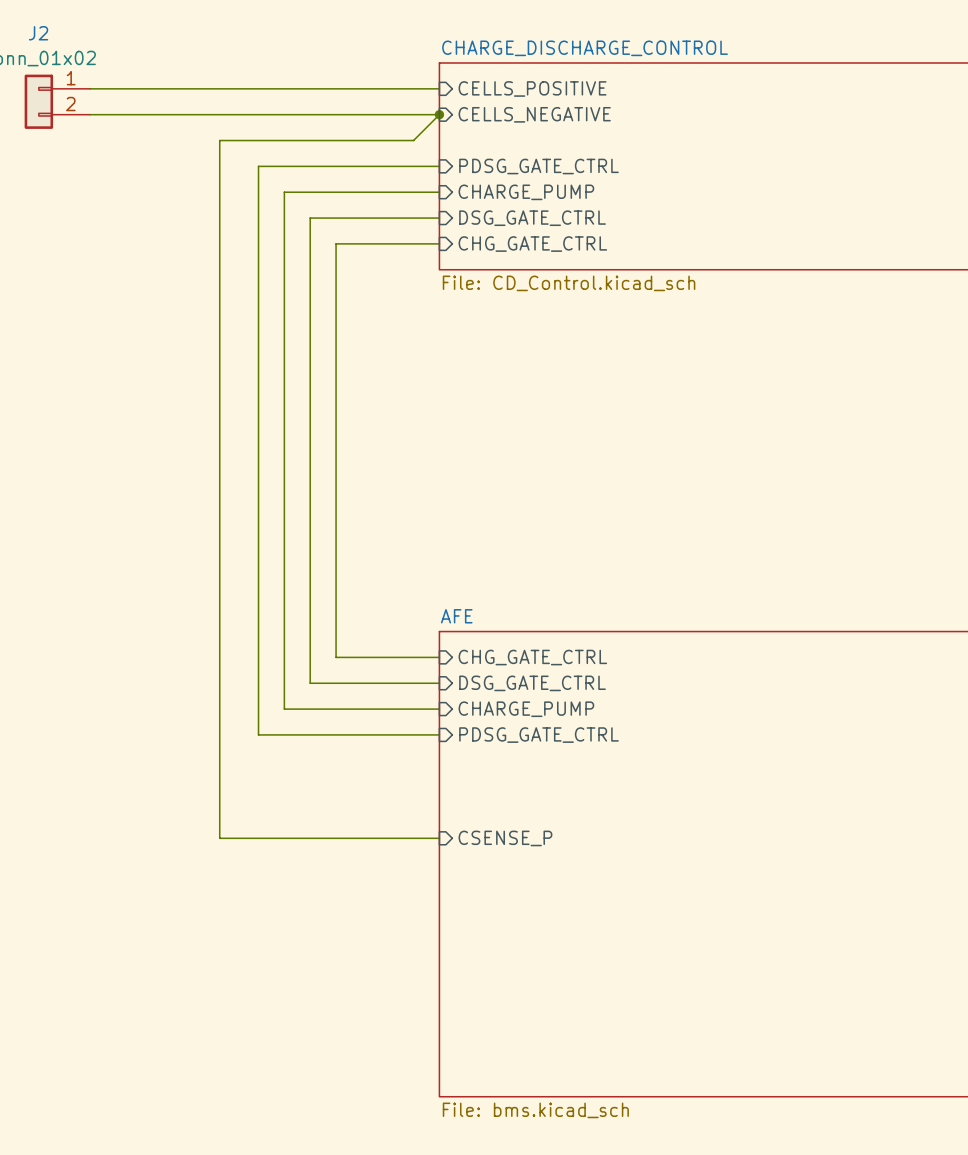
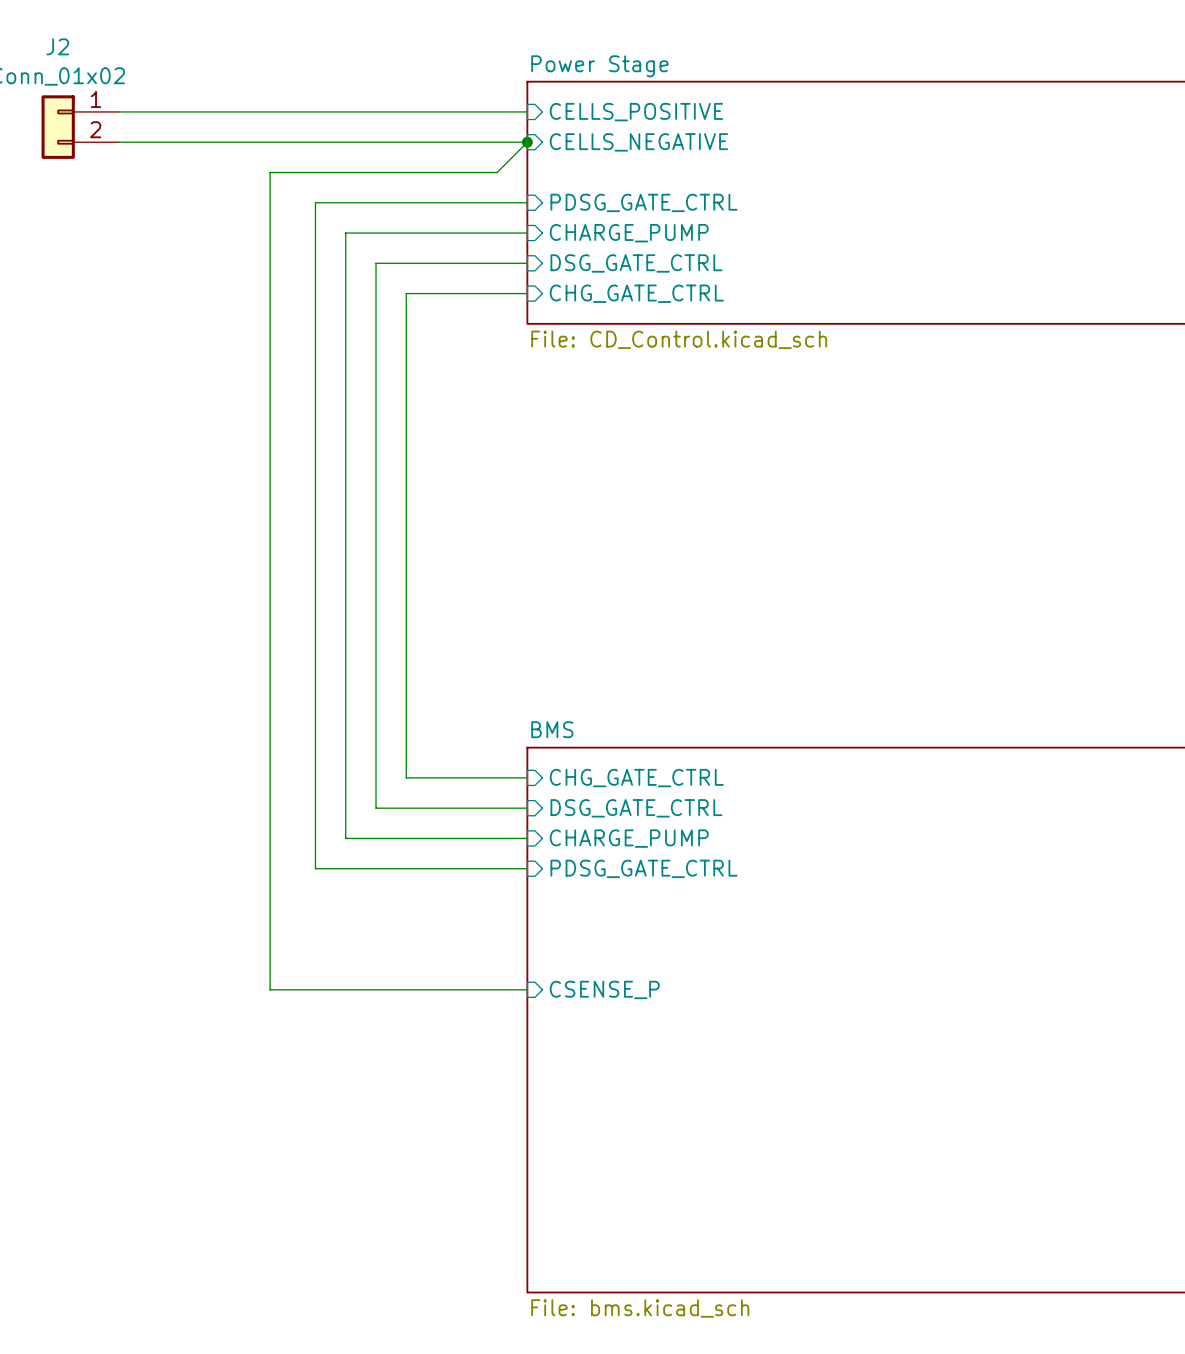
sheet CHARGE_DISCHARGE_CONTROL name: CHARGE_DISCHARGE_CONTROL (585, 48) -> Power Stage (599, 66)
sheet AFE name: AFE (456, 616) -> BMS (552, 729)

